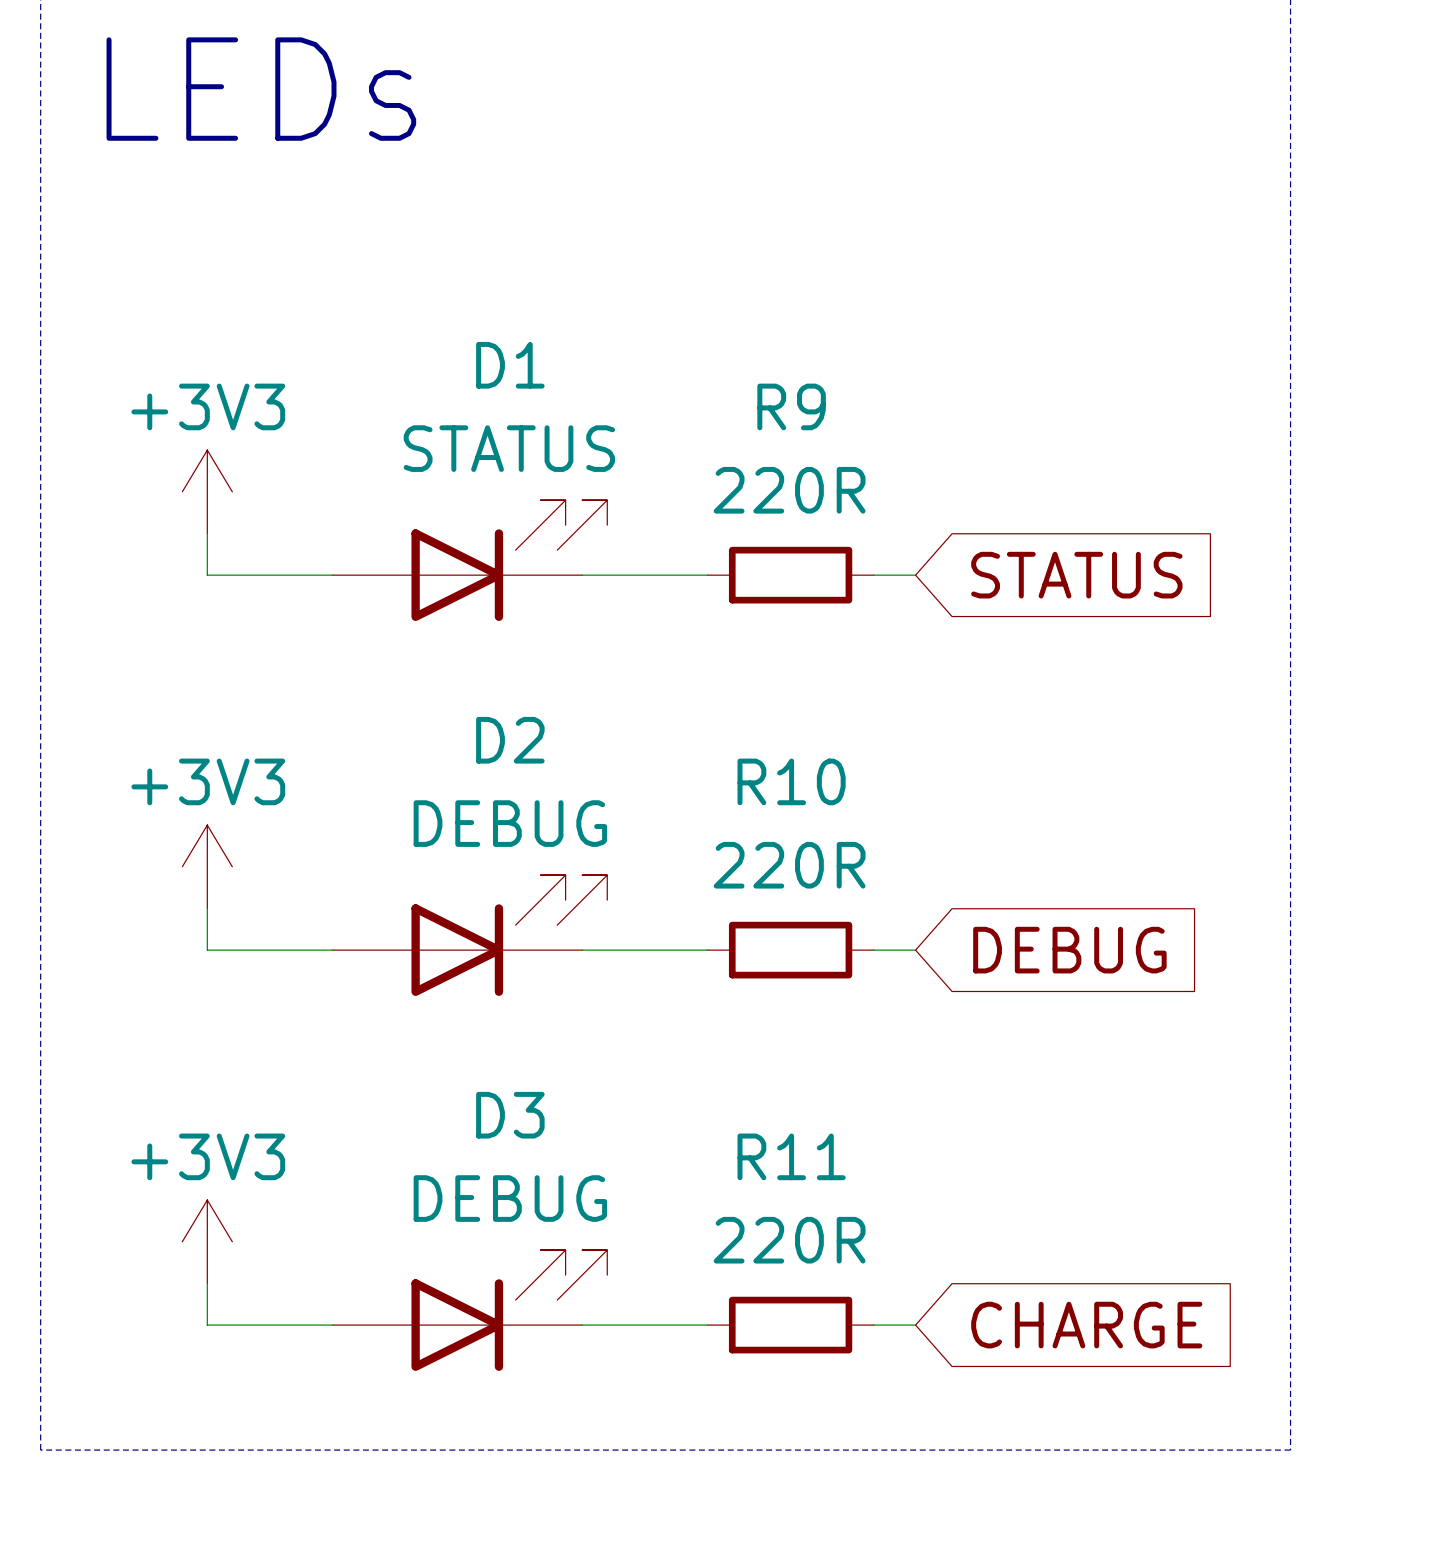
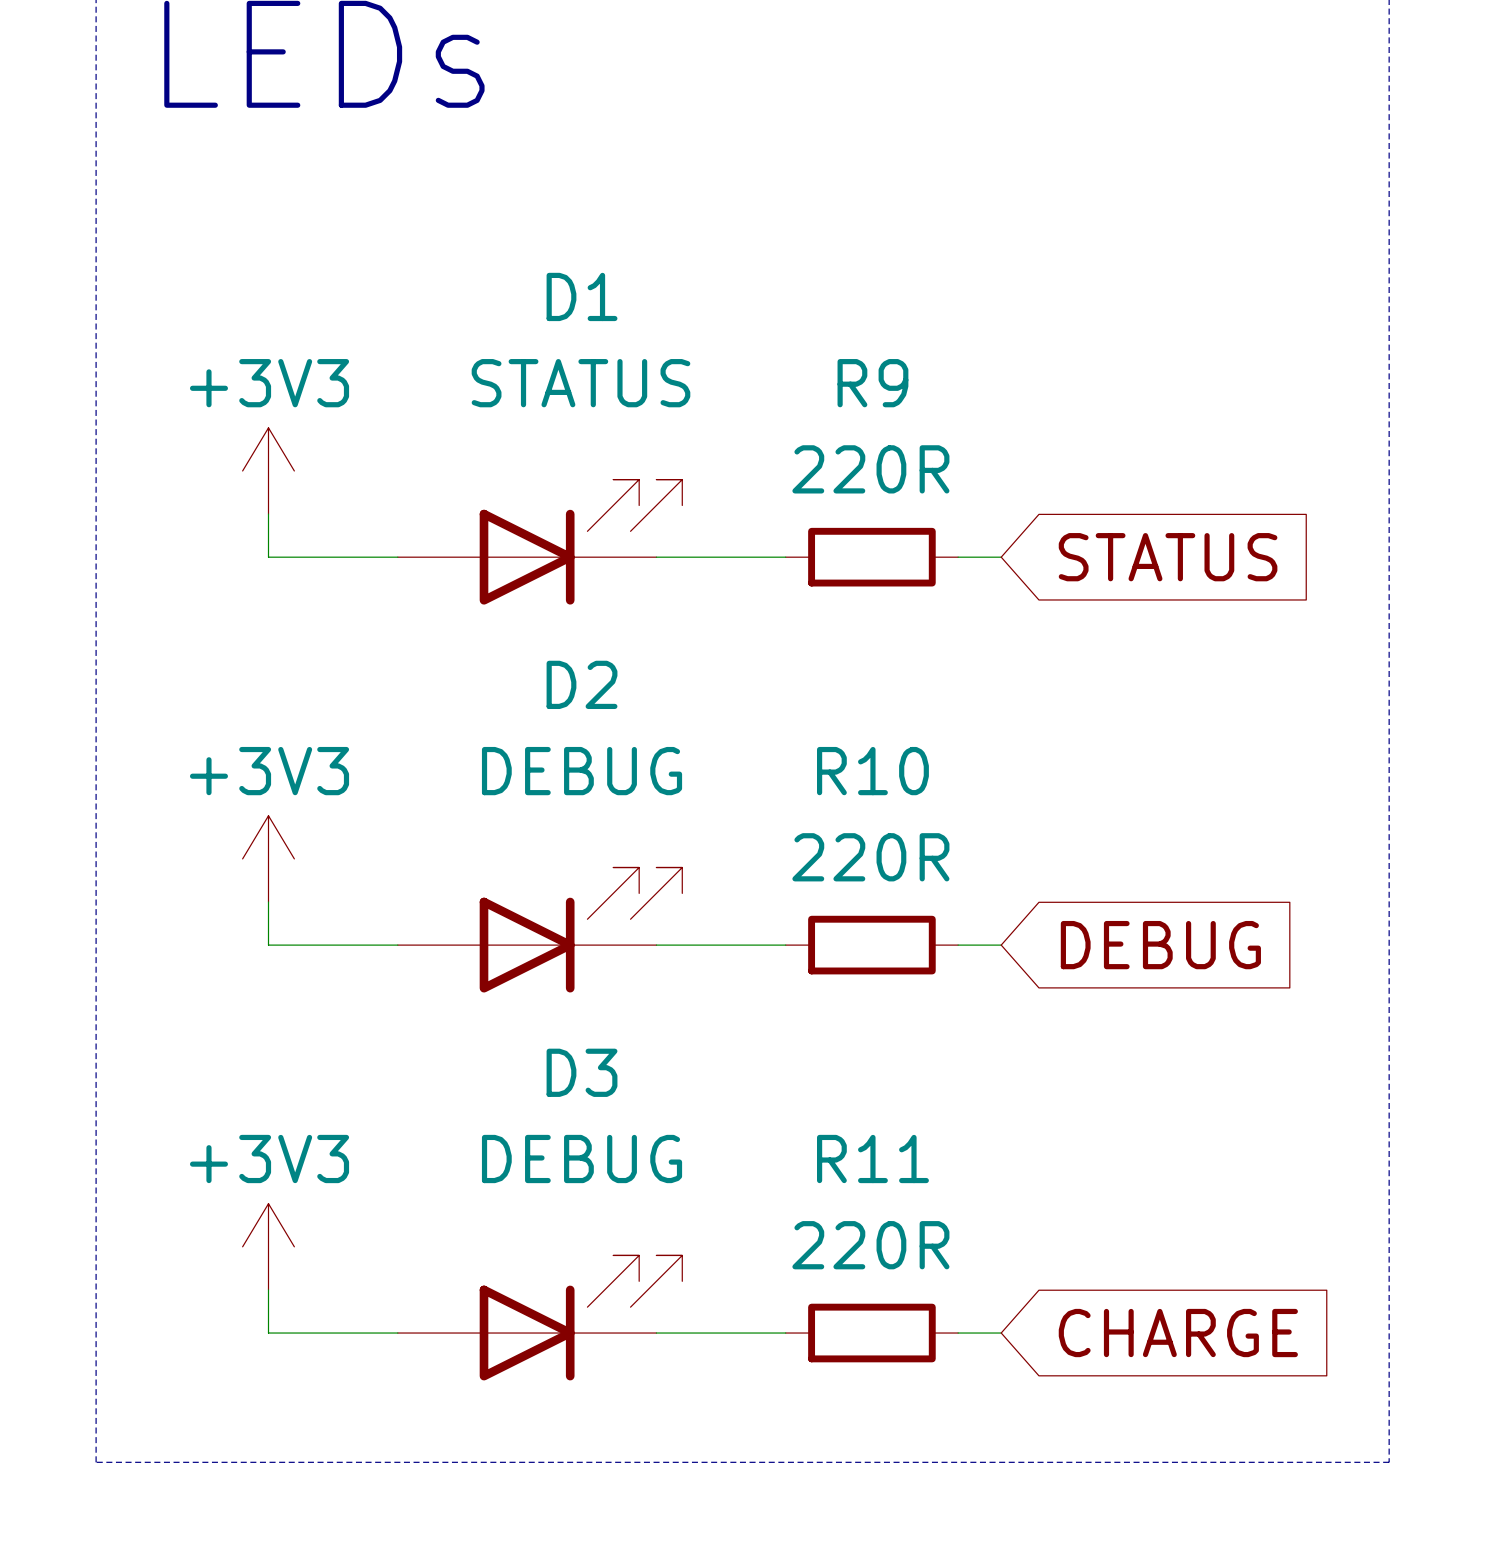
D1 name position: D1 (510, 365) -> D1 (582, 296)
D1 value position: STATUS (509, 448) -> STATUS (580, 383)
D2 name position: D2 (510, 740) -> D2 (582, 684)
D2 value position: DEBUG (510, 823) -> DEBUG (582, 771)
D3 name position: D3 (510, 1115) -> D3 (582, 1072)
D3 value position: DEBUG (510, 1198) -> DEBUG (582, 1159)

